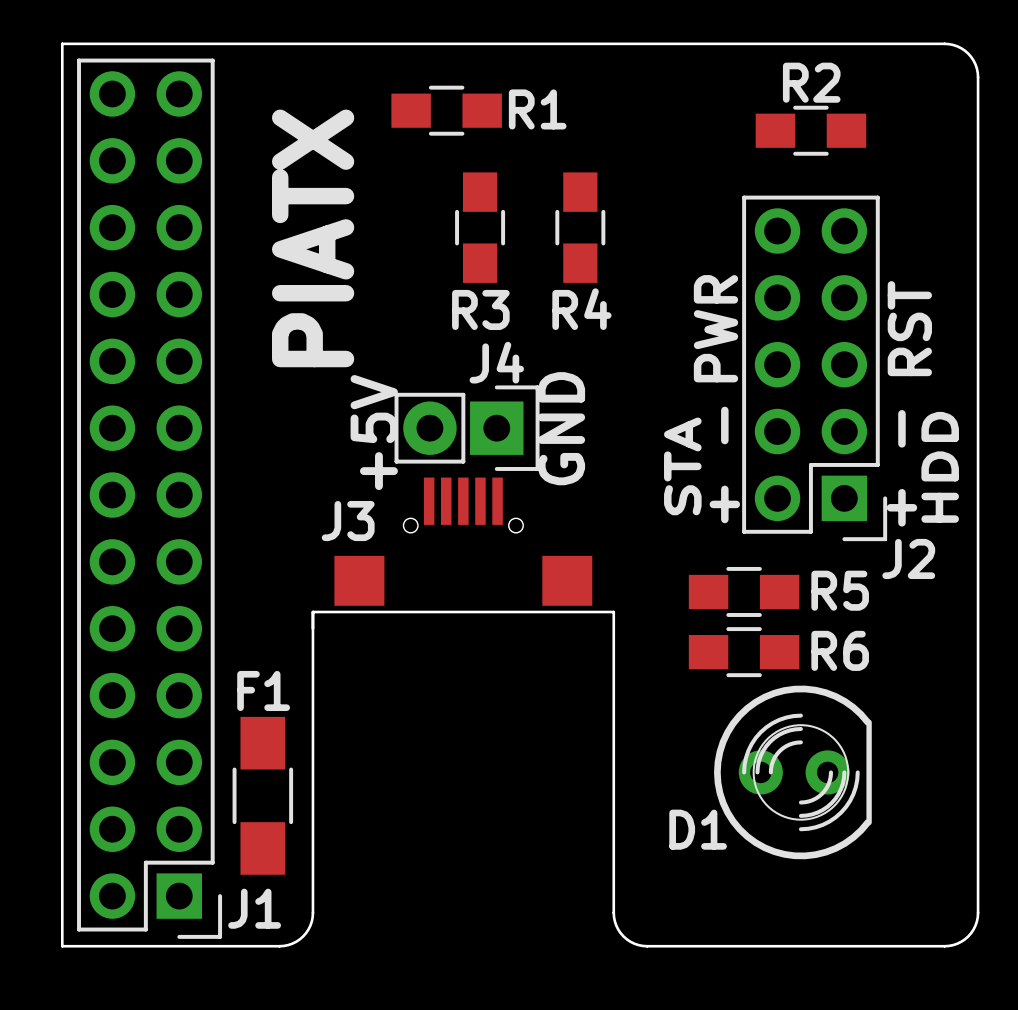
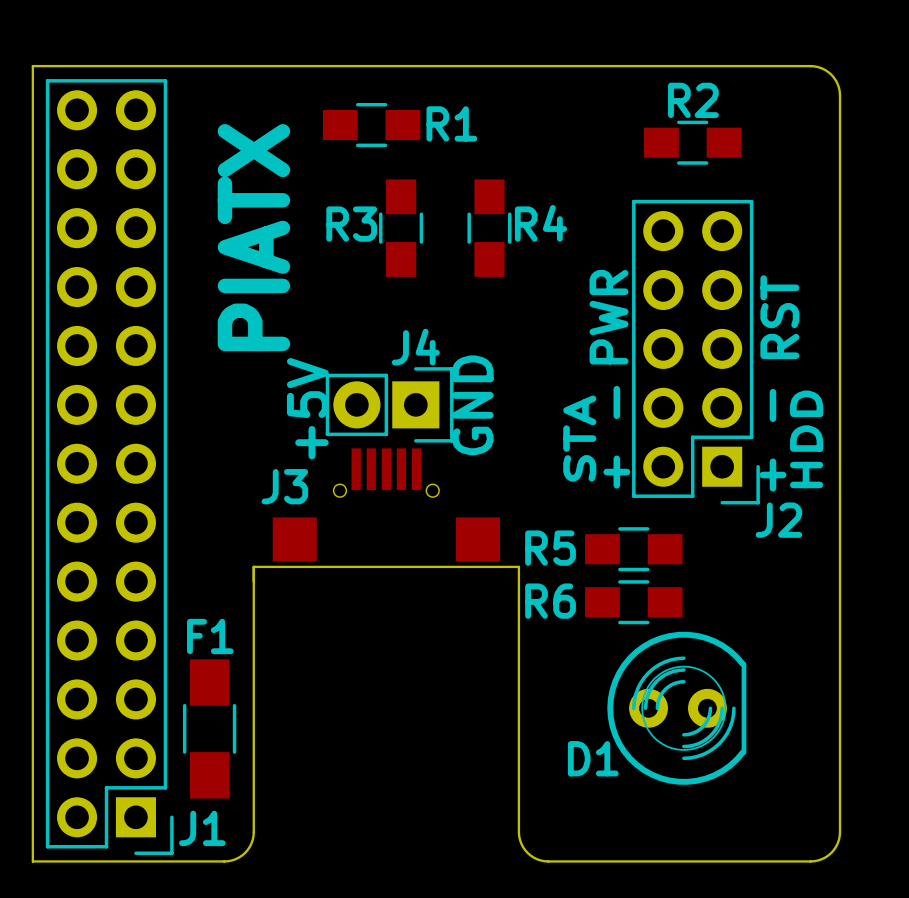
R3 name position: R3 (480, 309) -> R3 (351, 224)
R4 name position: R4 (581, 309) -> R4 (540, 223)
R5 name position: R5 (840, 590) -> R5 (550, 548)
R6 name position: R6 (840, 650) -> R6 (550, 601)

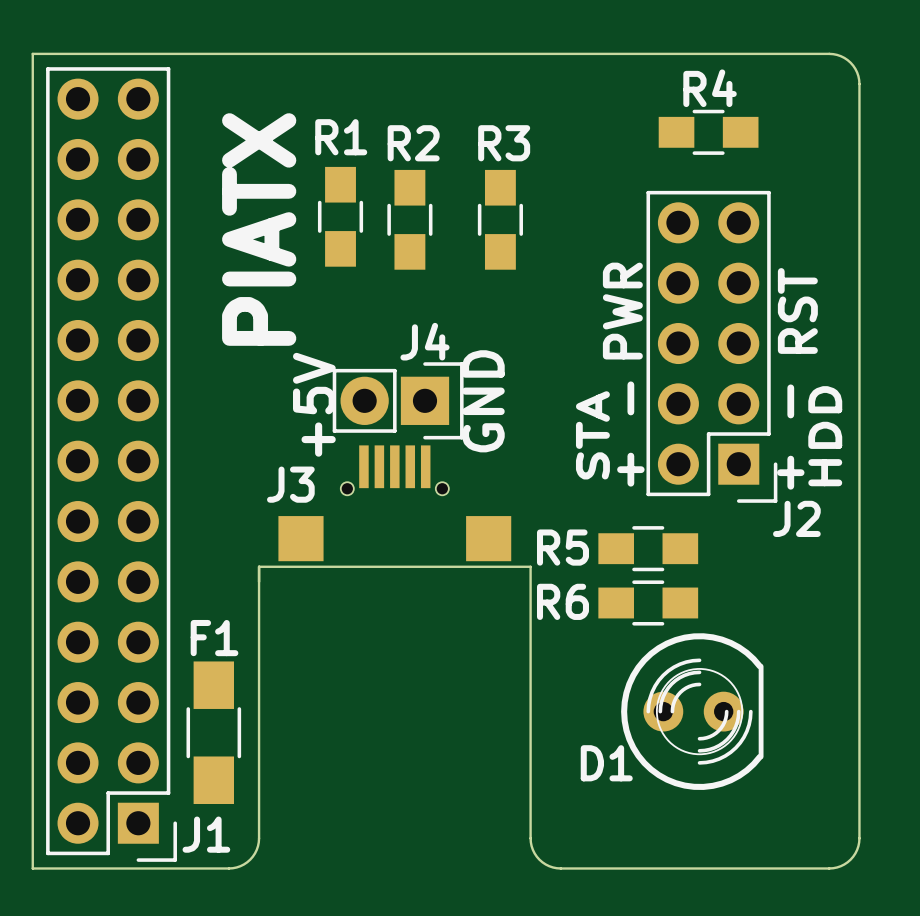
R2 name: R2 (693, 100) -> R4 (710, 88)
R1 name position: R1 (451, 123) -> R1 (341, 137)
R1 rotation: 0° (371, 125) -> 90° clockwise (340, 216)
R1 position: (371, 125) -> (340, 216)
R4 name: R4 (540, 223) -> R3 (504, 143)
R3 name: R3 (351, 224) -> R2 (413, 143)

